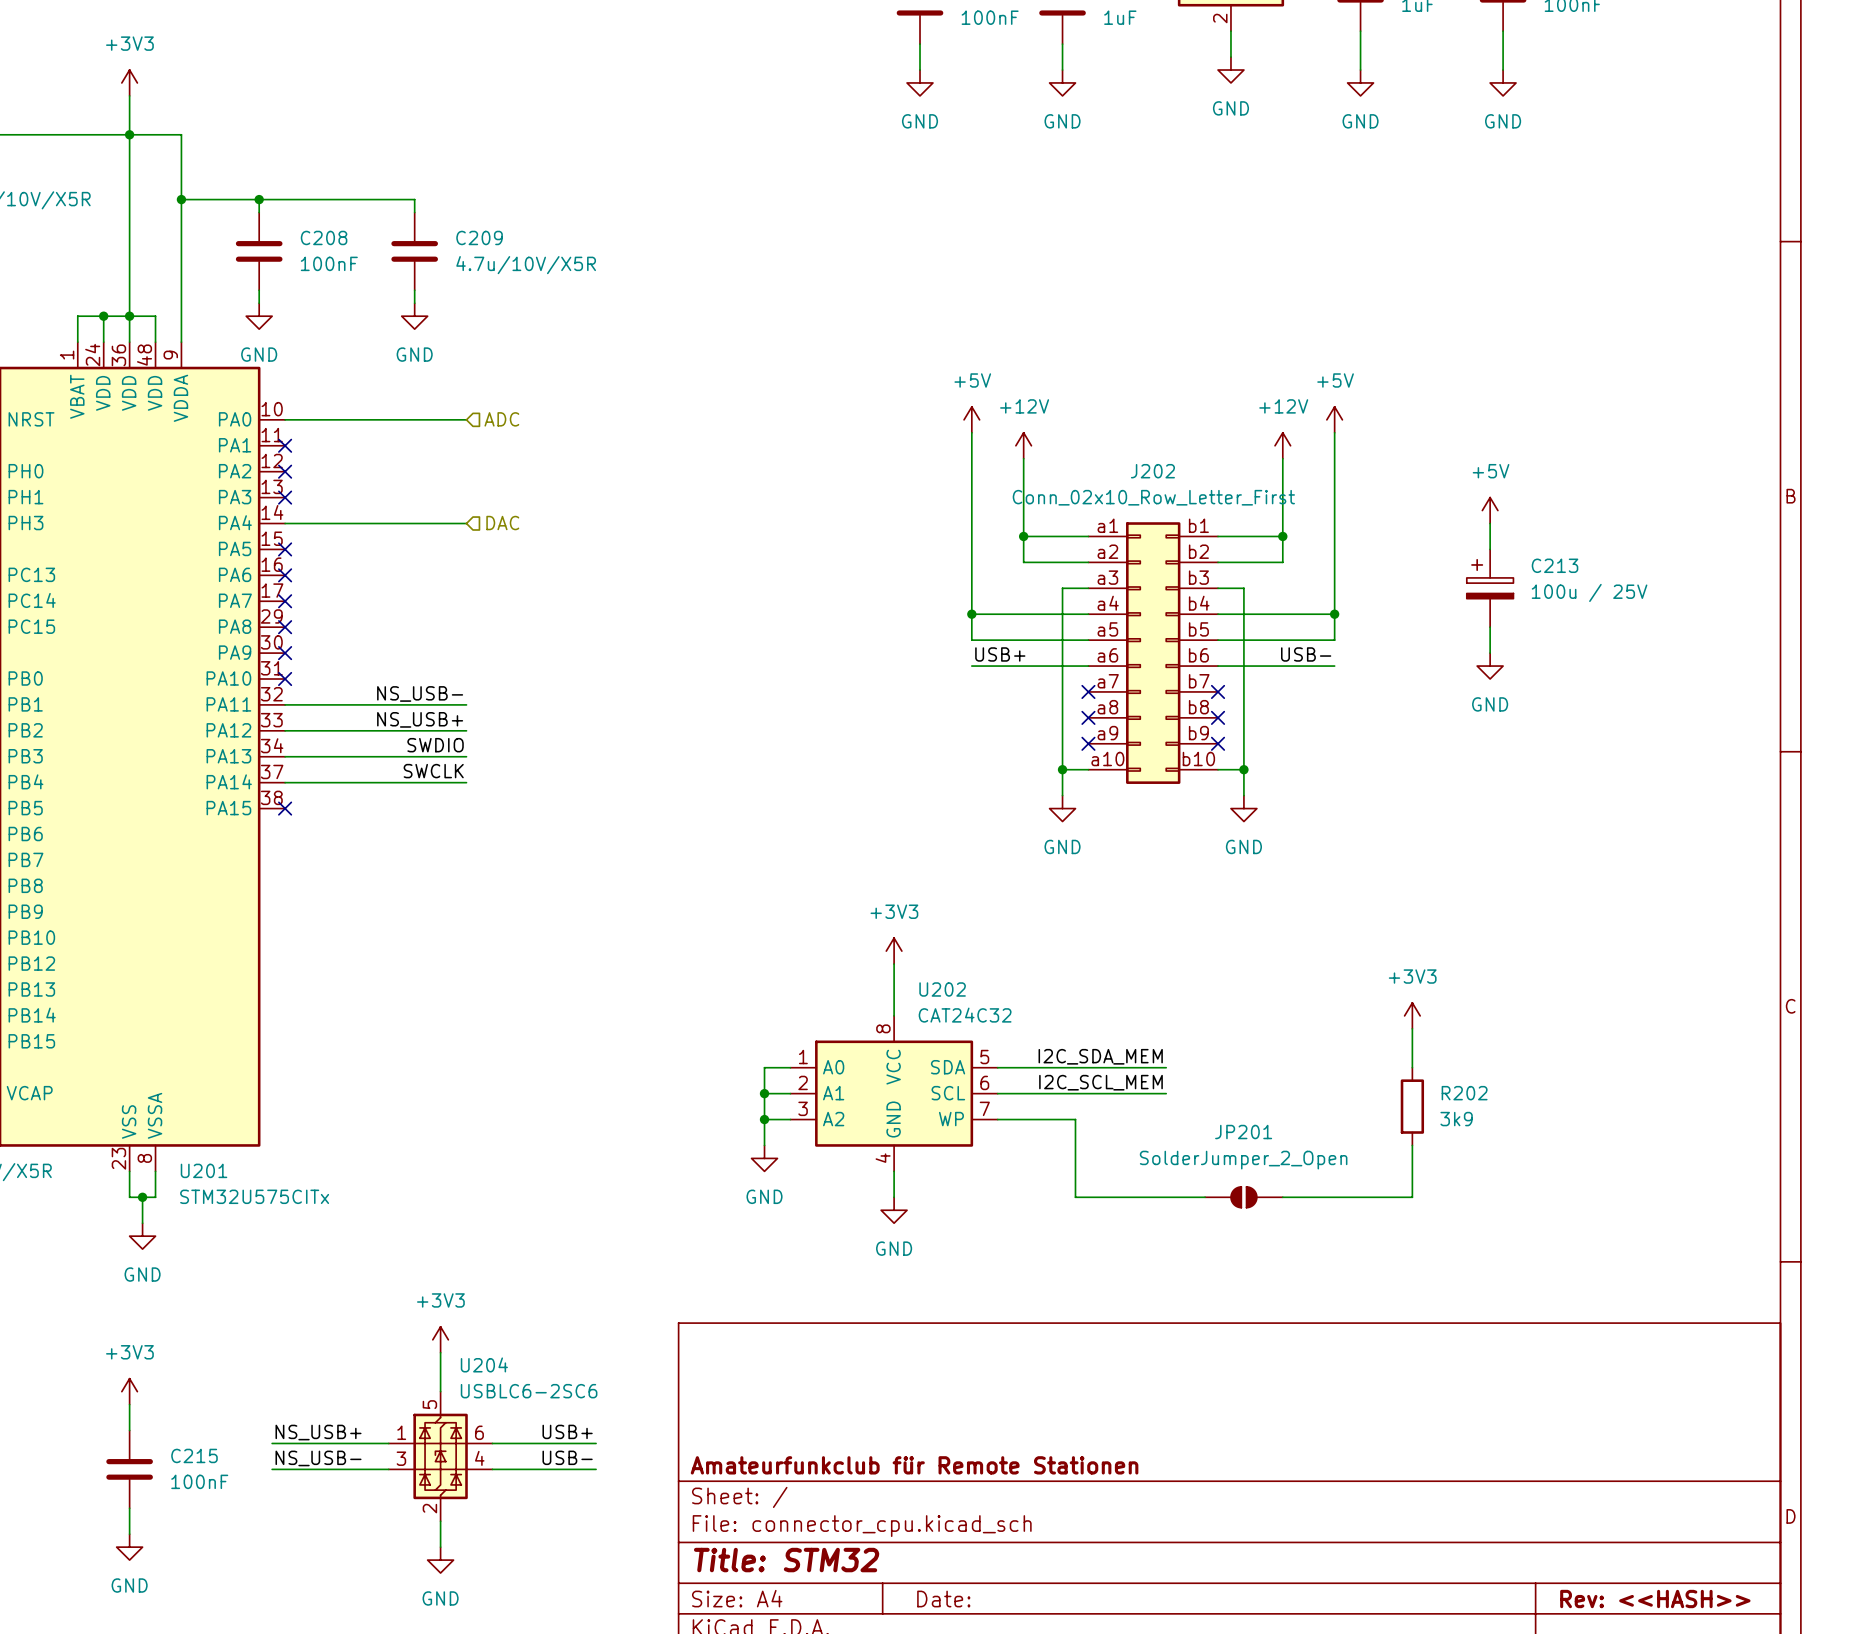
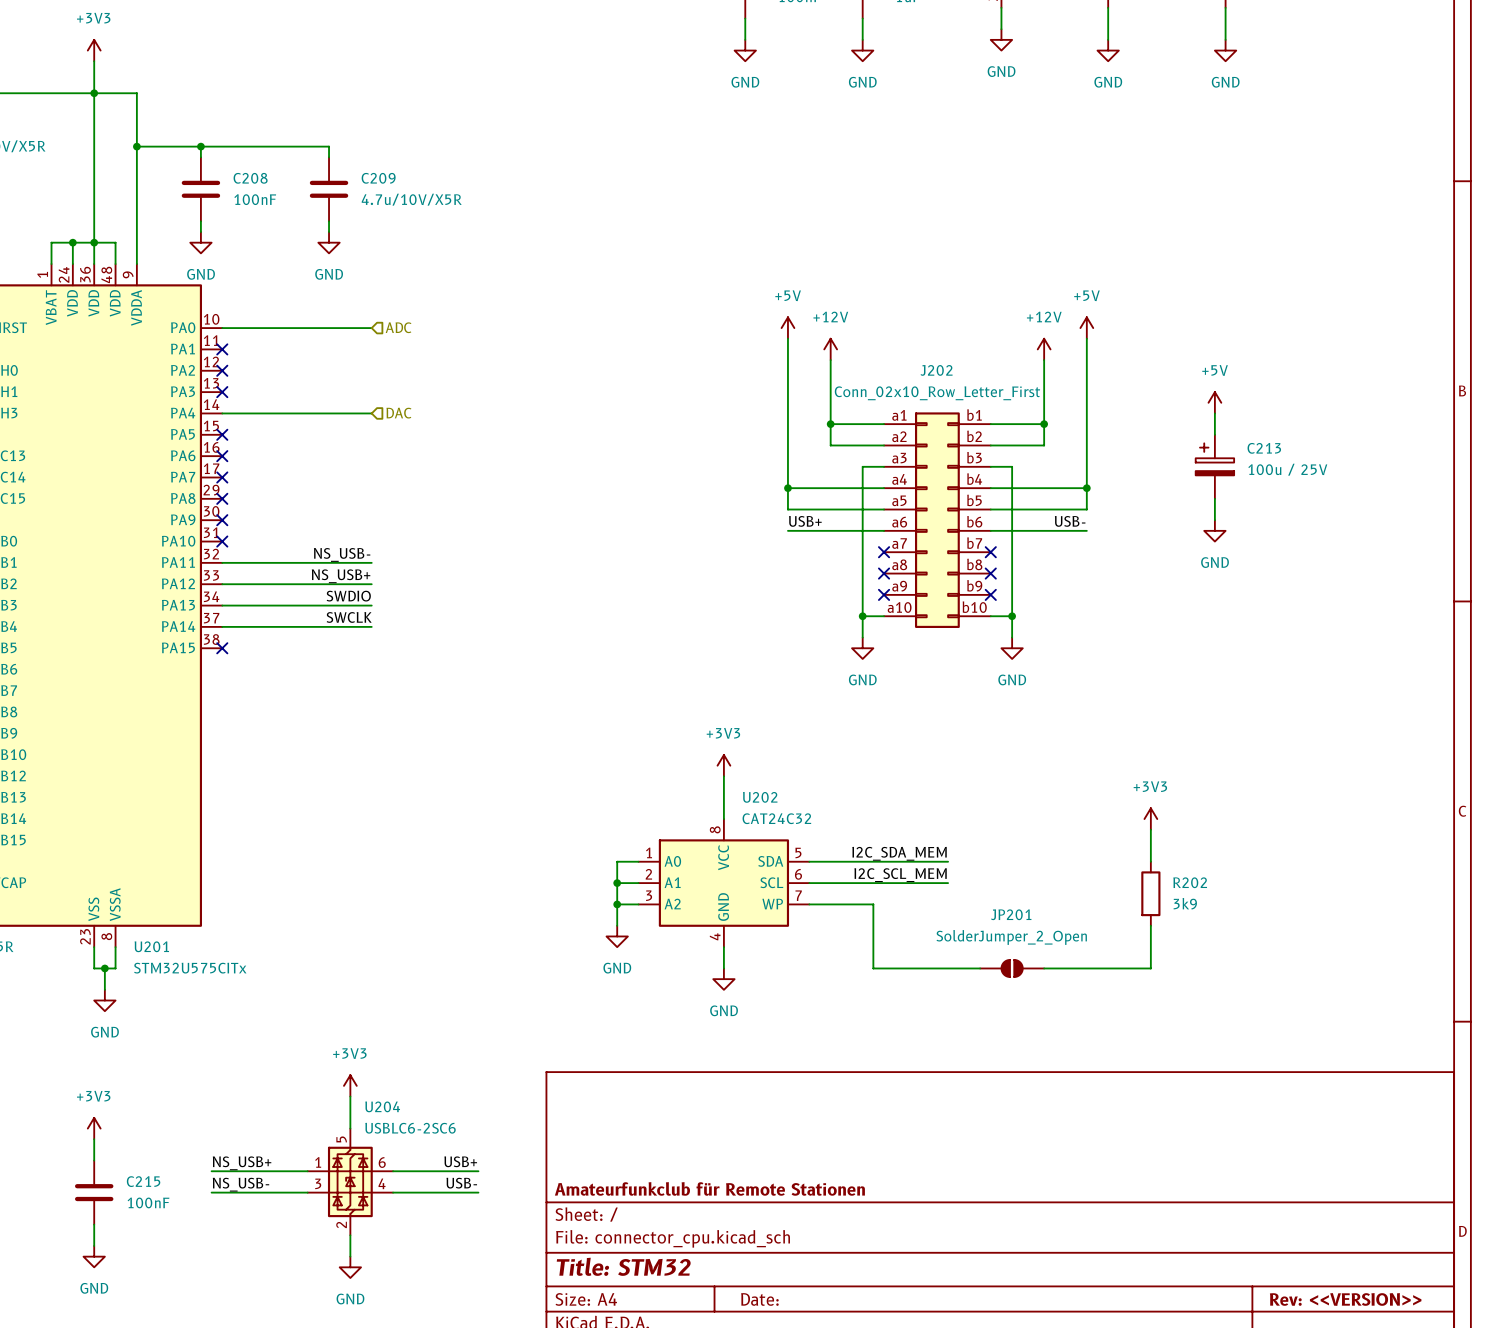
title block: Rev: <<HASH>> (1655, 1599) -> Rev: <<VERSION>> (1345, 1299)

